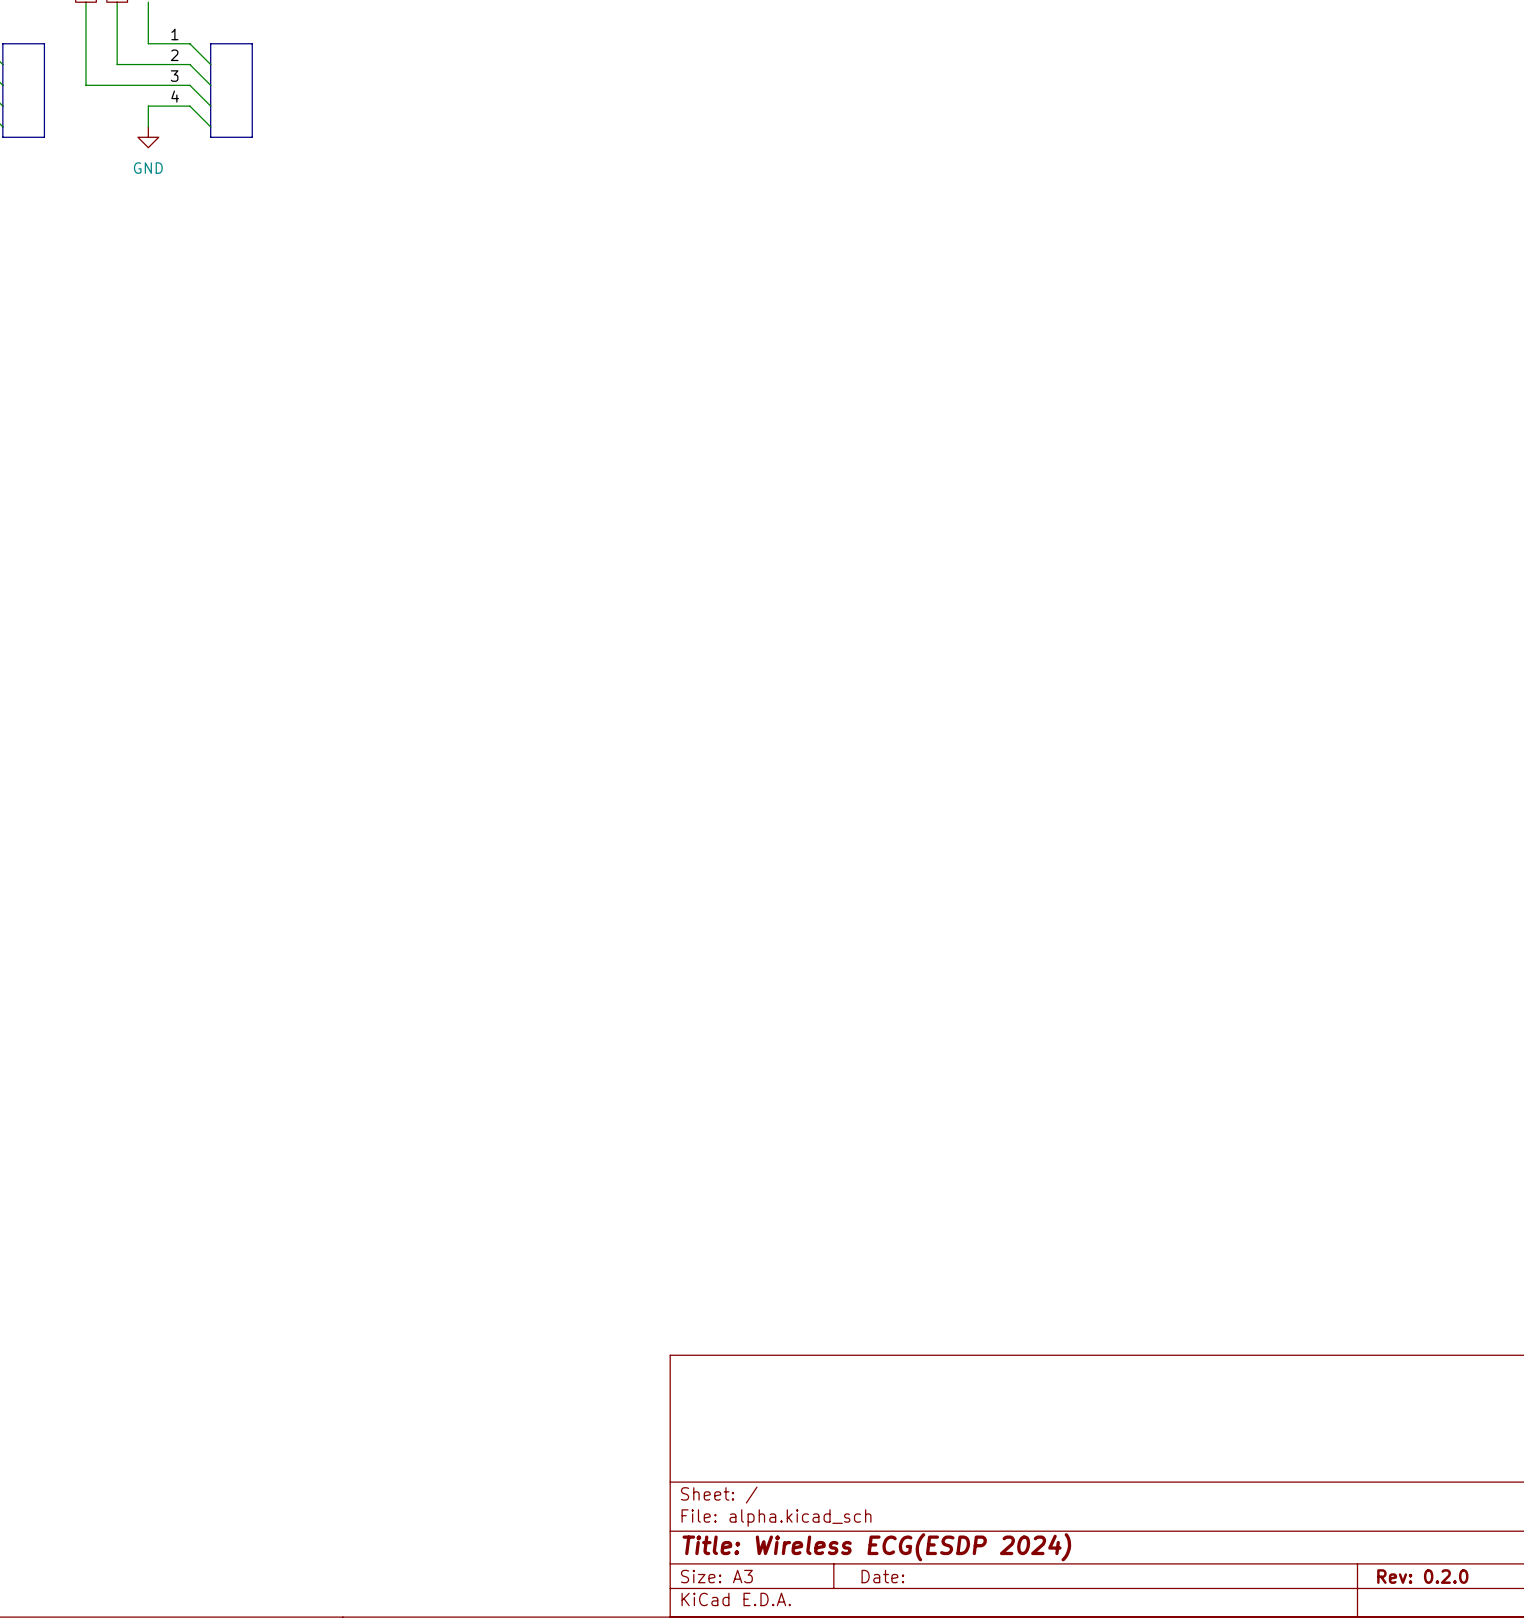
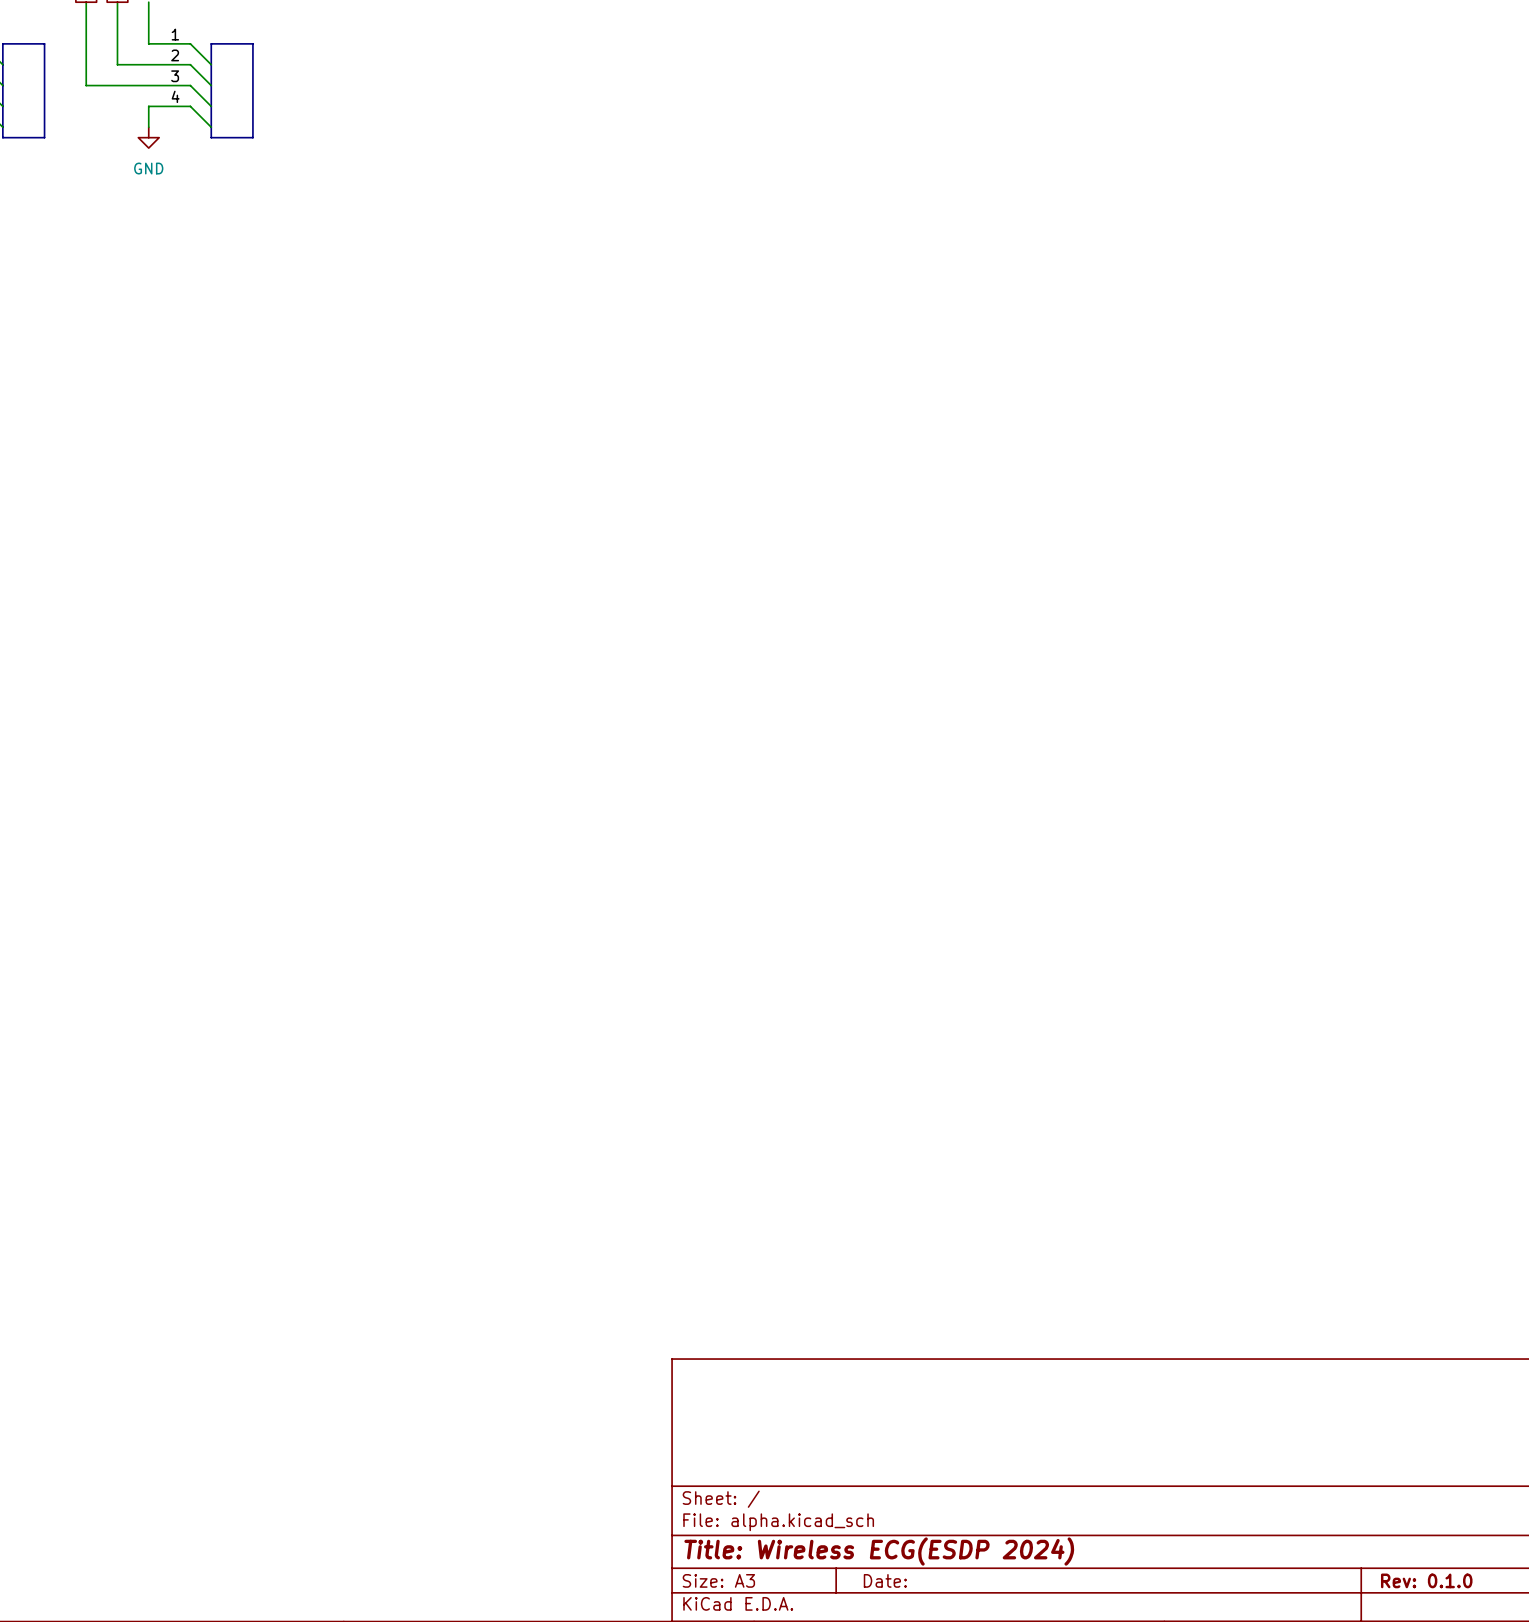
title block: Rev: 0.2.0 (1422, 1576) -> Rev: 0.1.0 (1426, 1580)

